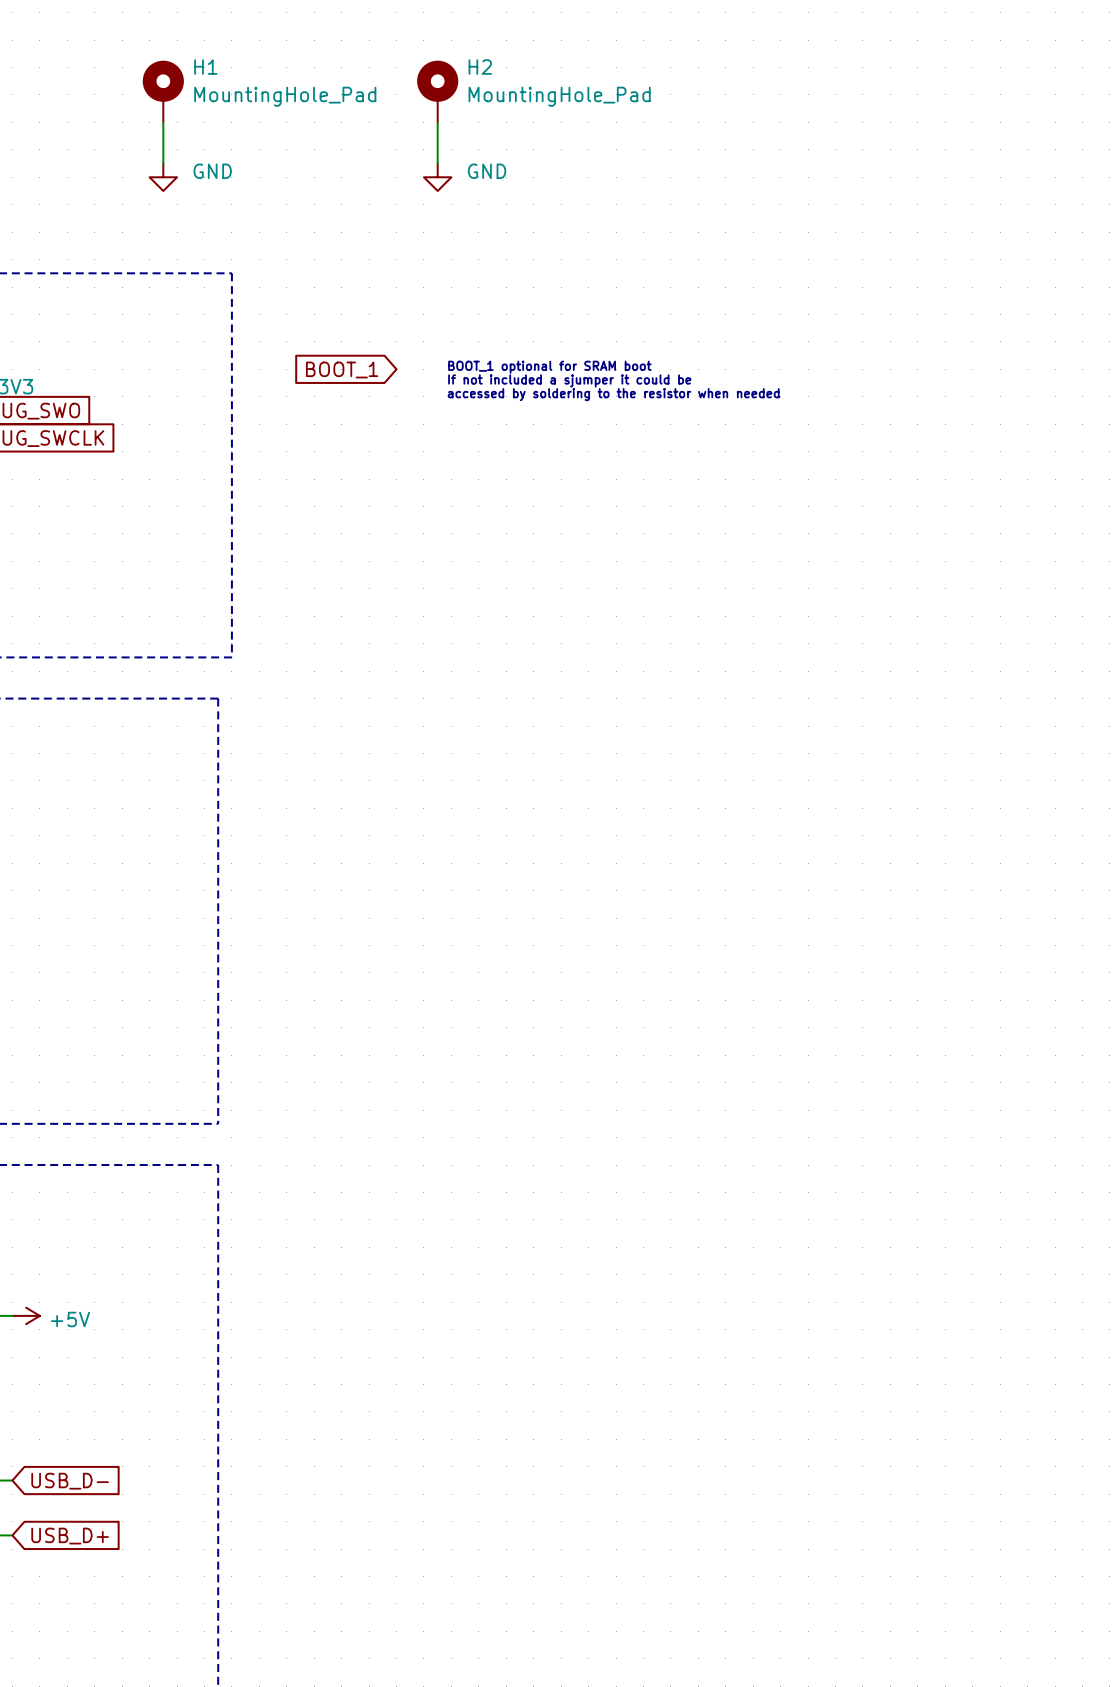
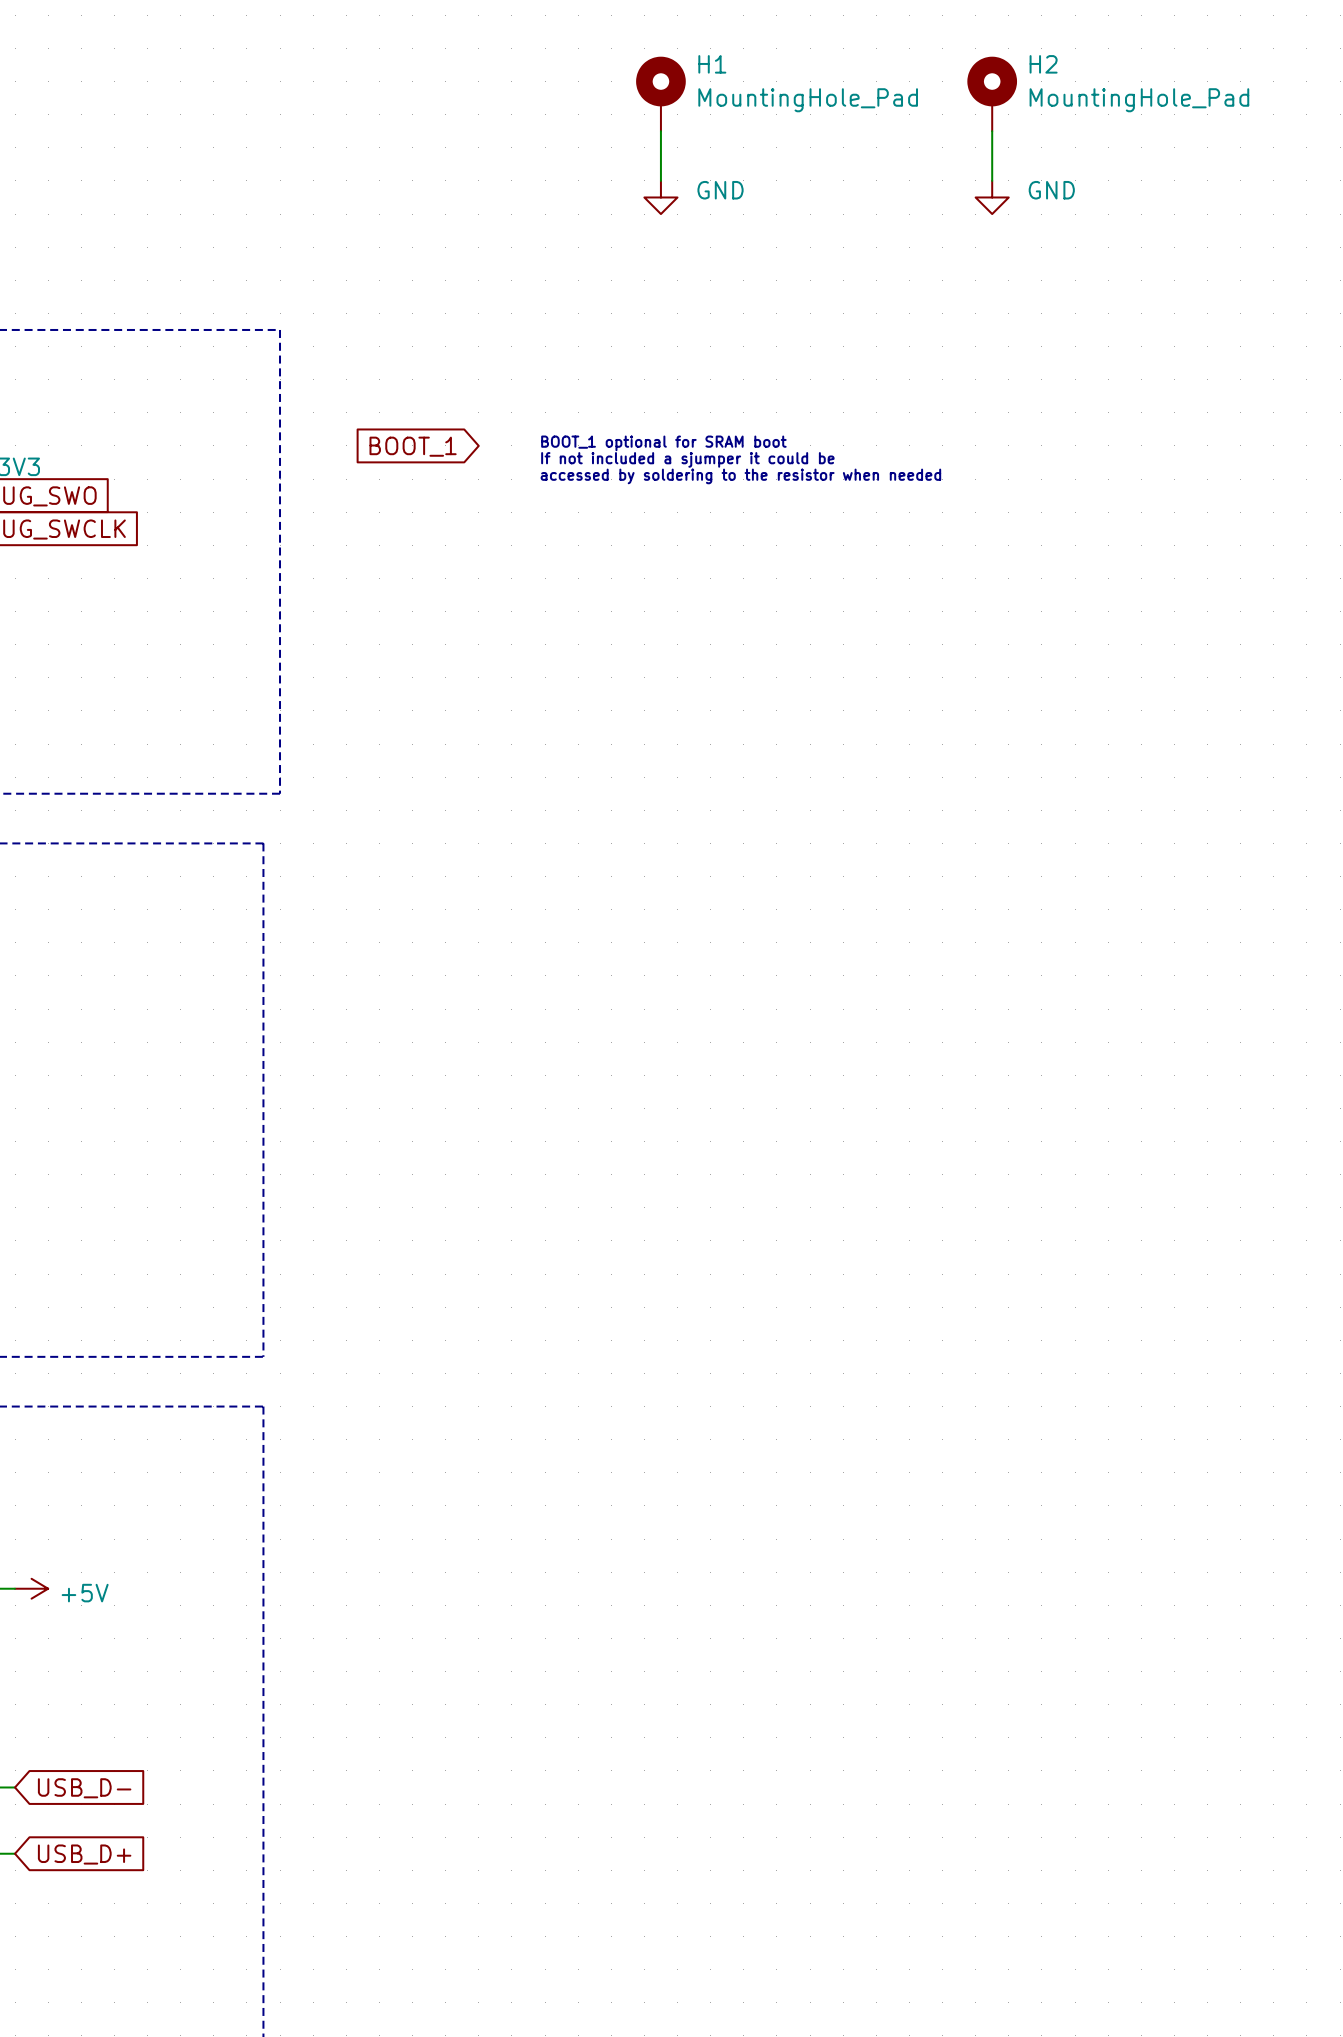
H1 position: (163, 91) -> (660, 93)
H2 position: (437, 91) -> (992, 93)
wire: none -> (992, 131) (992, 180)
wire: (163, 122) (163, 163) -> none
wire: (437, 122) (437, 163) -> (660, 131) (660, 180)
power symbol: none -> GND (992, 197)
power symbol: GND (163, 177) -> none
power symbol position: GND (437, 177) -> GND (660, 197)

